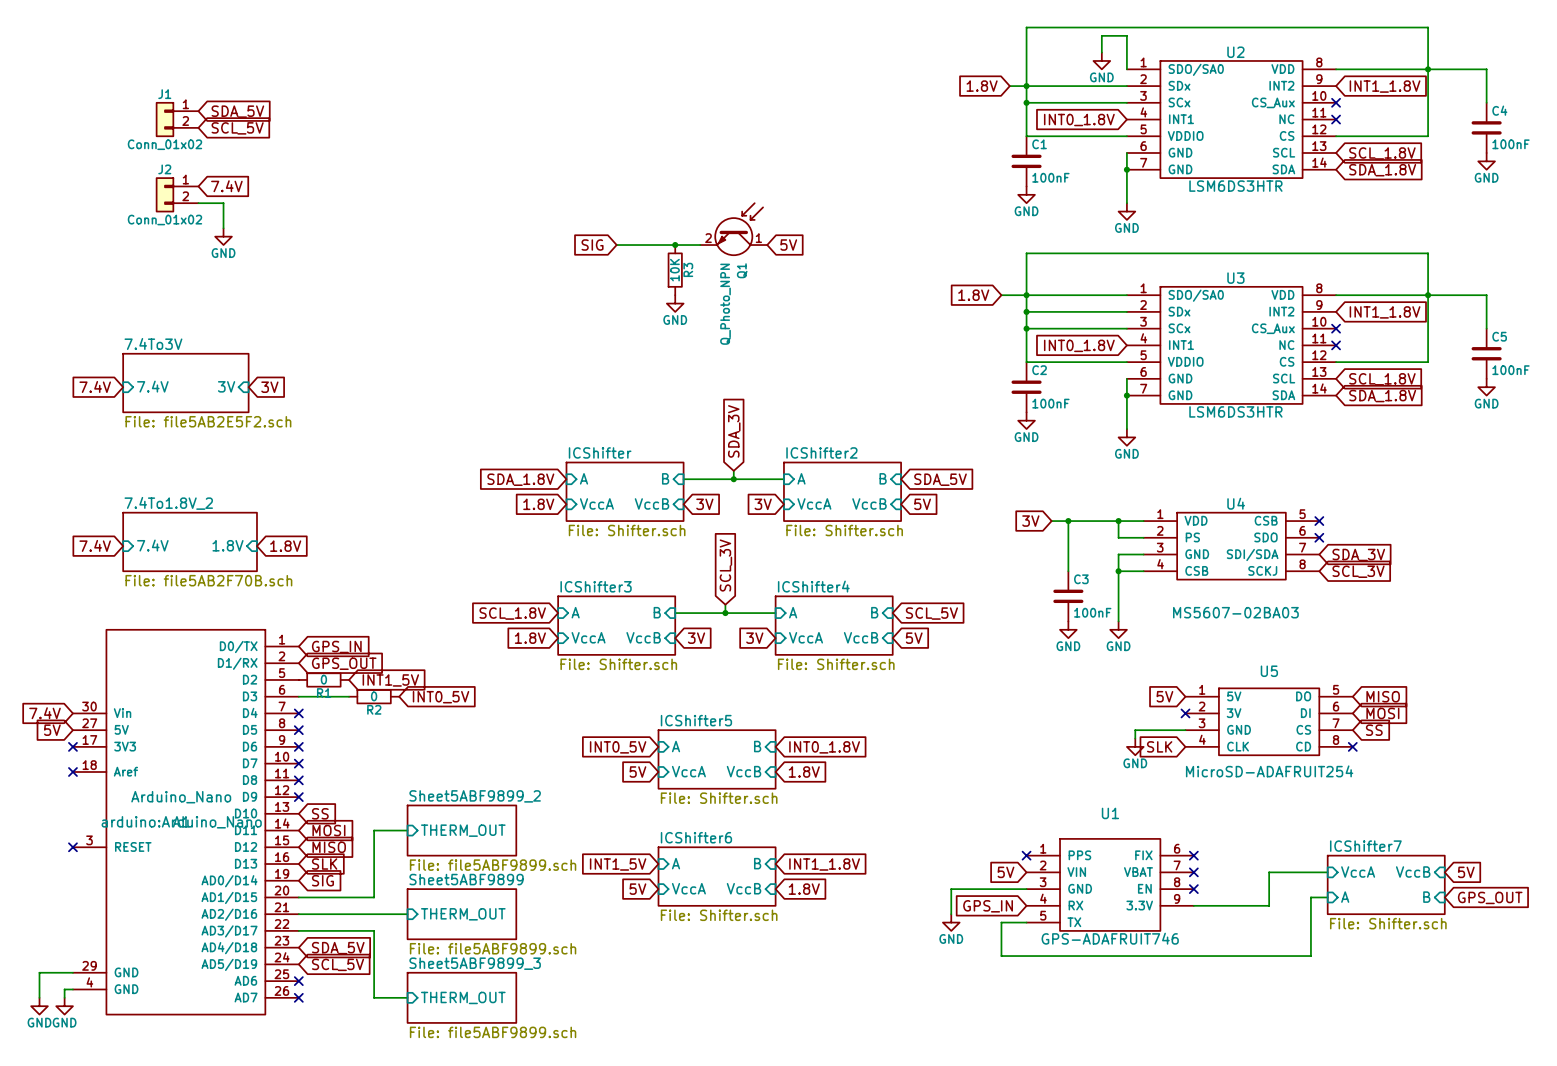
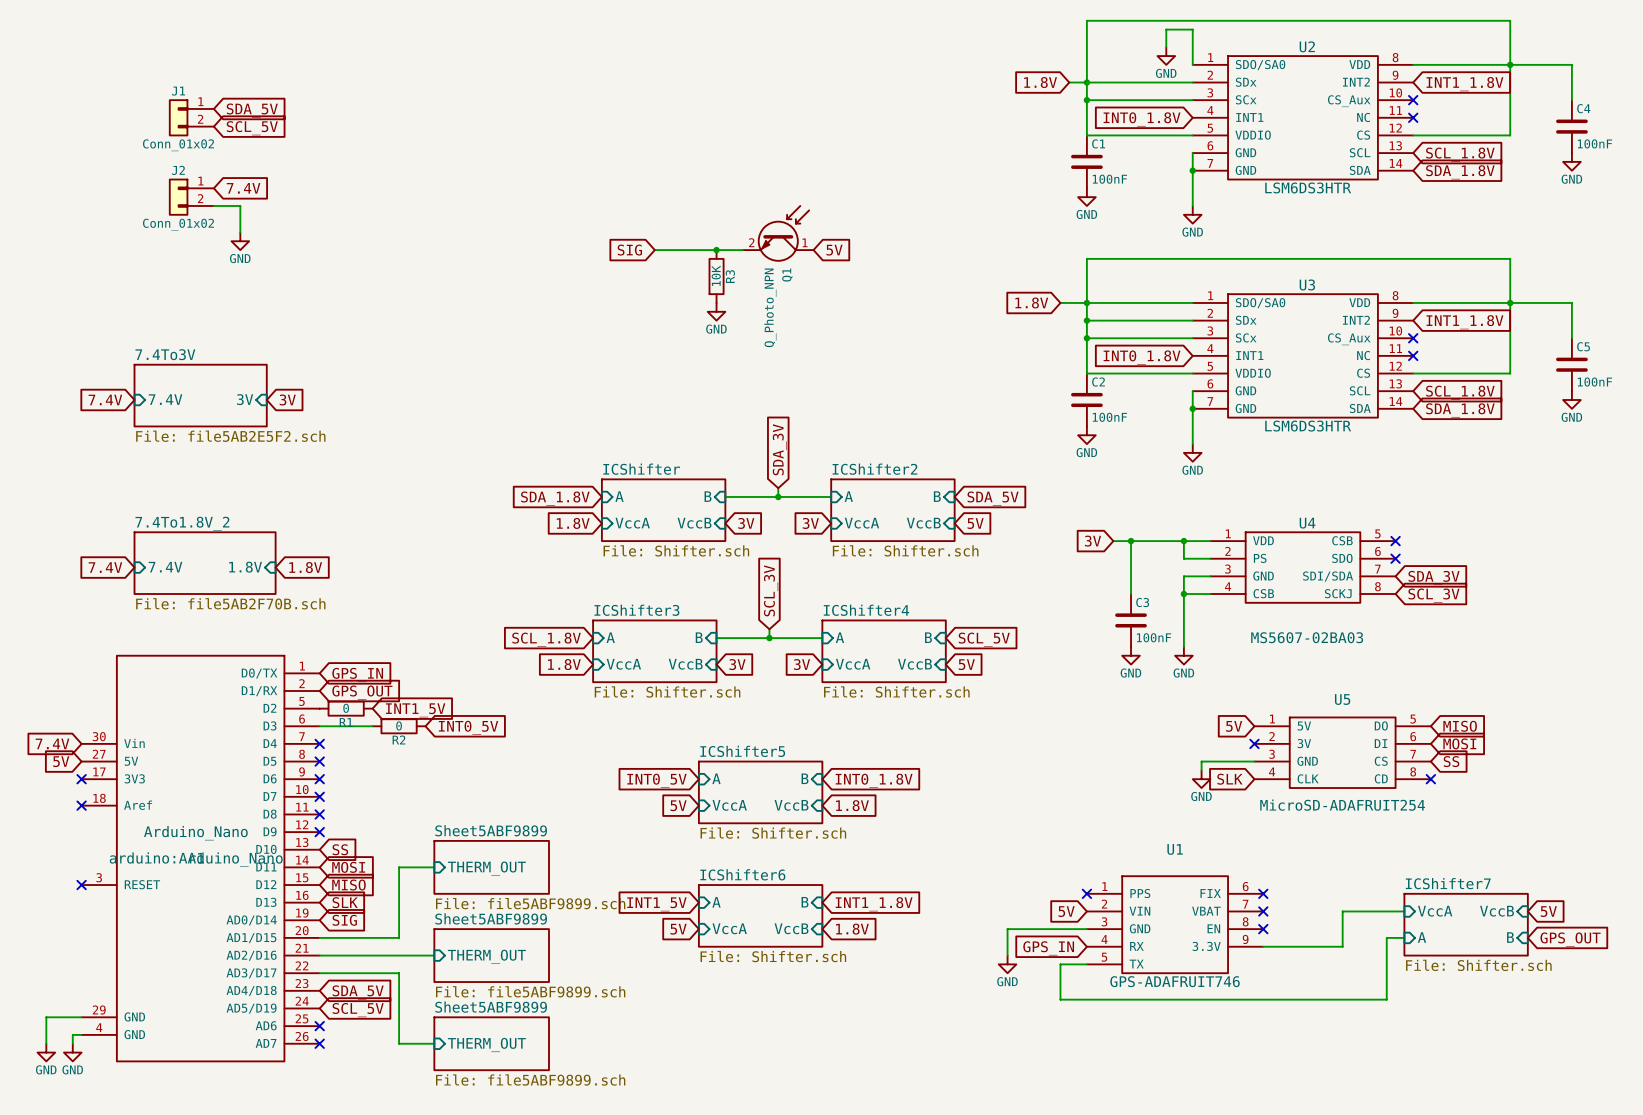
sheet Sheet5ABF9899_2 name: Sheet5ABF9899_2 (475, 796) -> Sheet5ABF9899 (491, 830)
sheet Sheet5ABF9899_3 name: Sheet5ABF9899_3 (475, 963) -> Sheet5ABF9899 (491, 1007)

